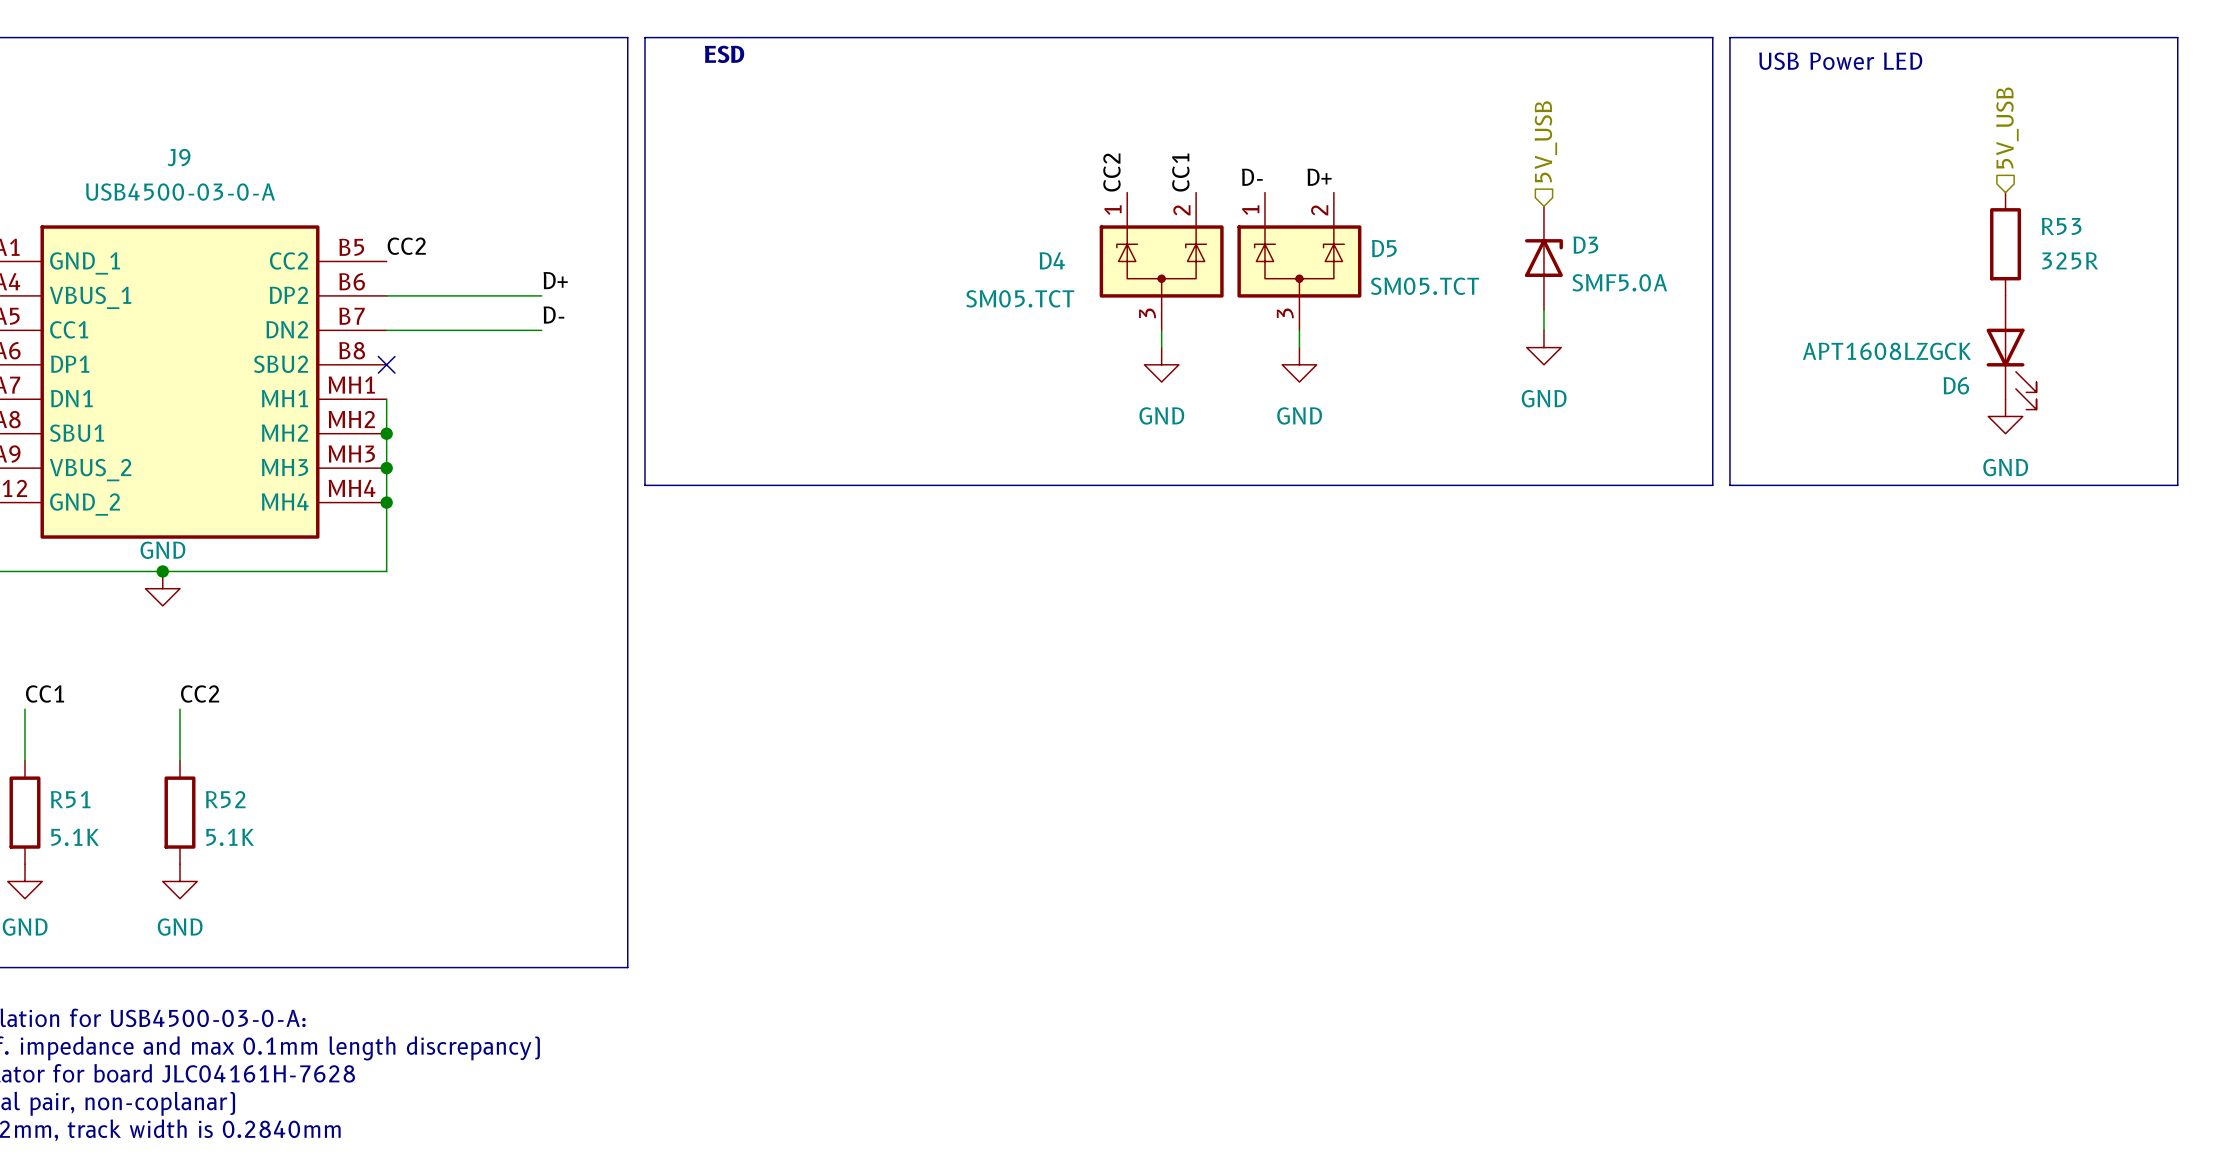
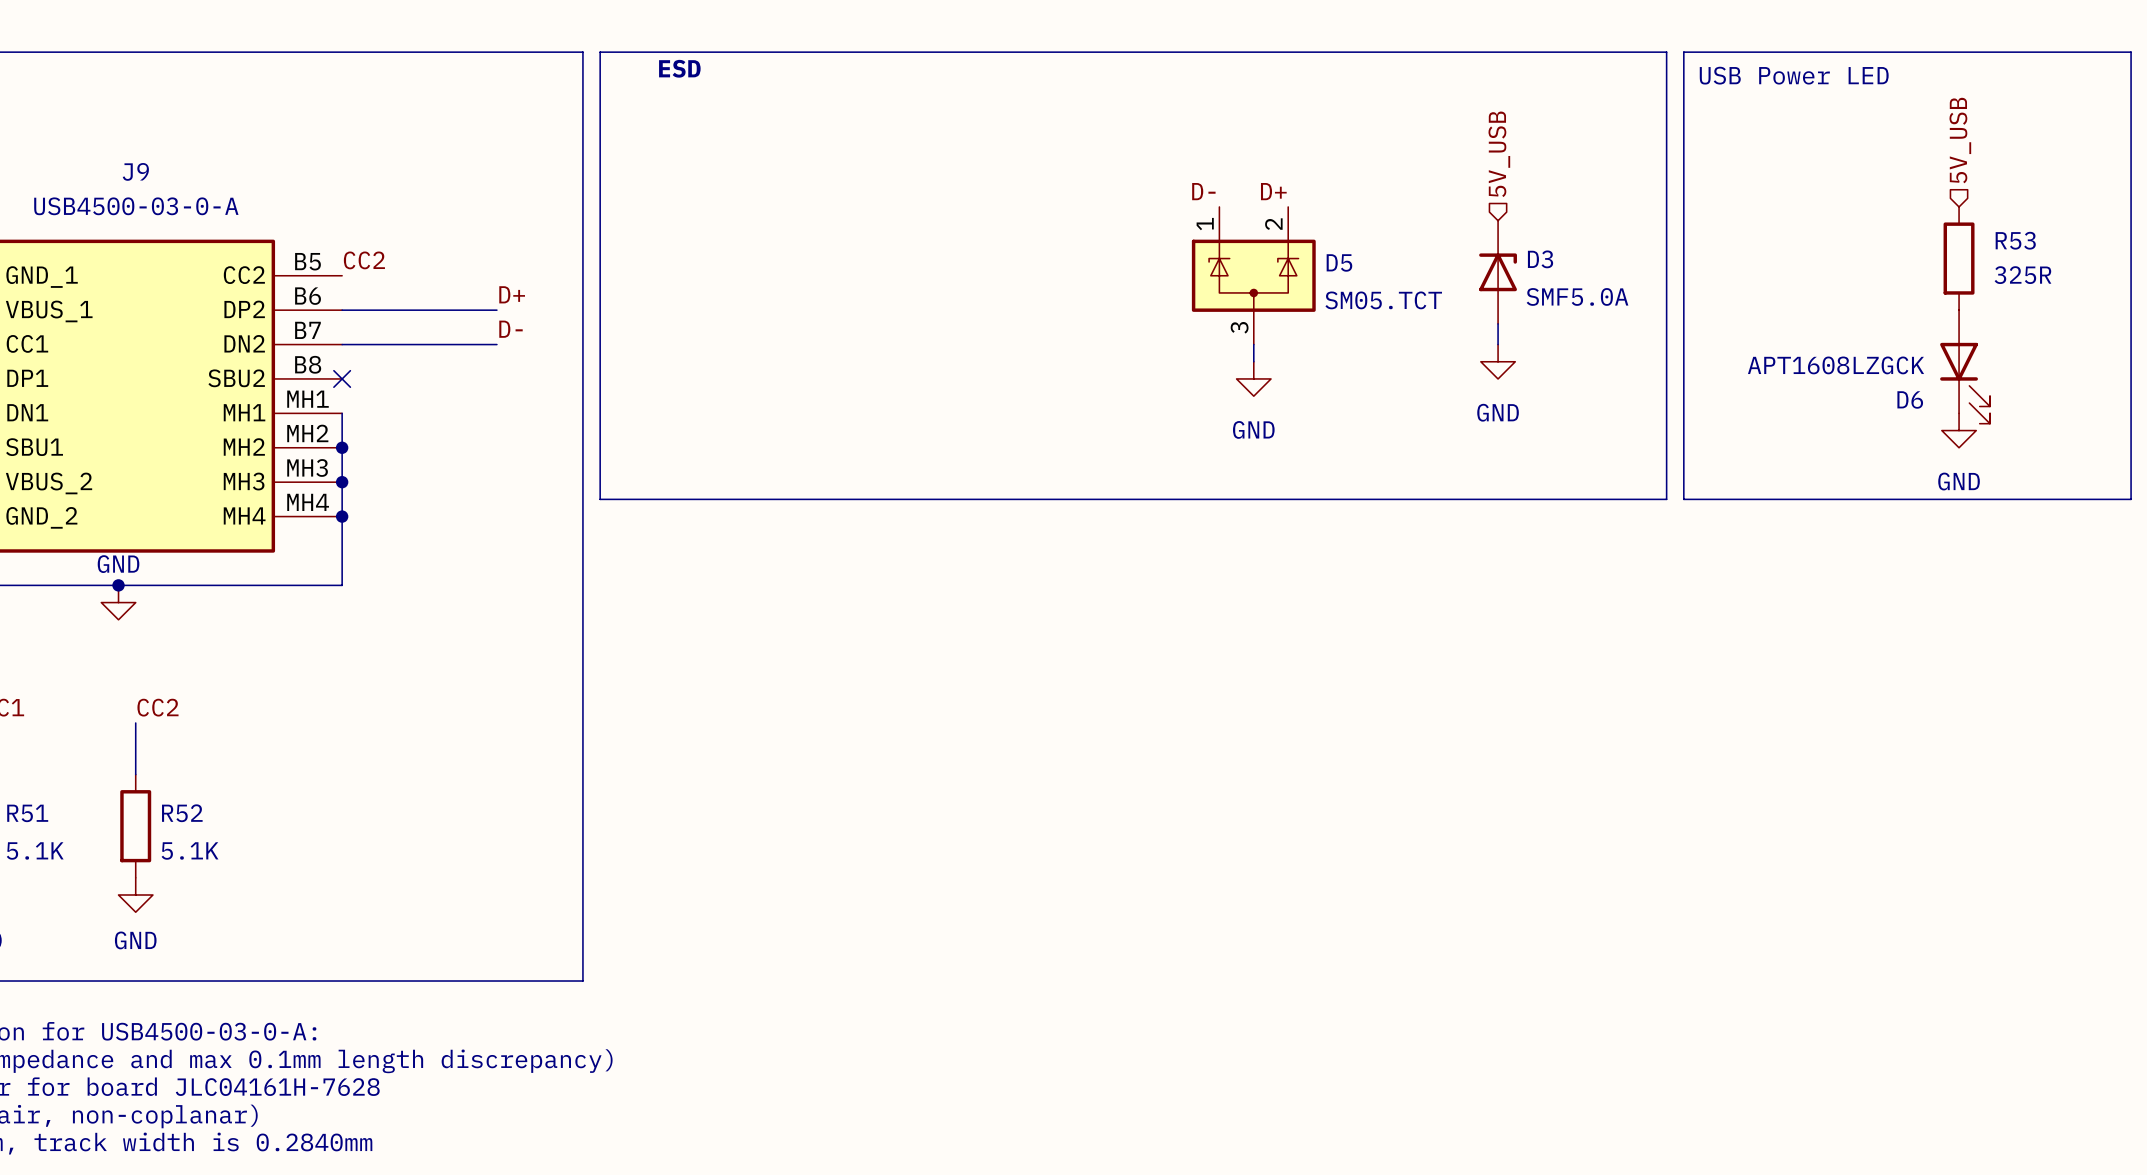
label: CC2 (1111, 172) -> none
label: CC1 (1180, 172) -> none
D4: SM05.TCT (1161, 261) -> none
wire: (1161, 330) (1161, 347) -> none
power symbol: GND (1161, 364) -> none

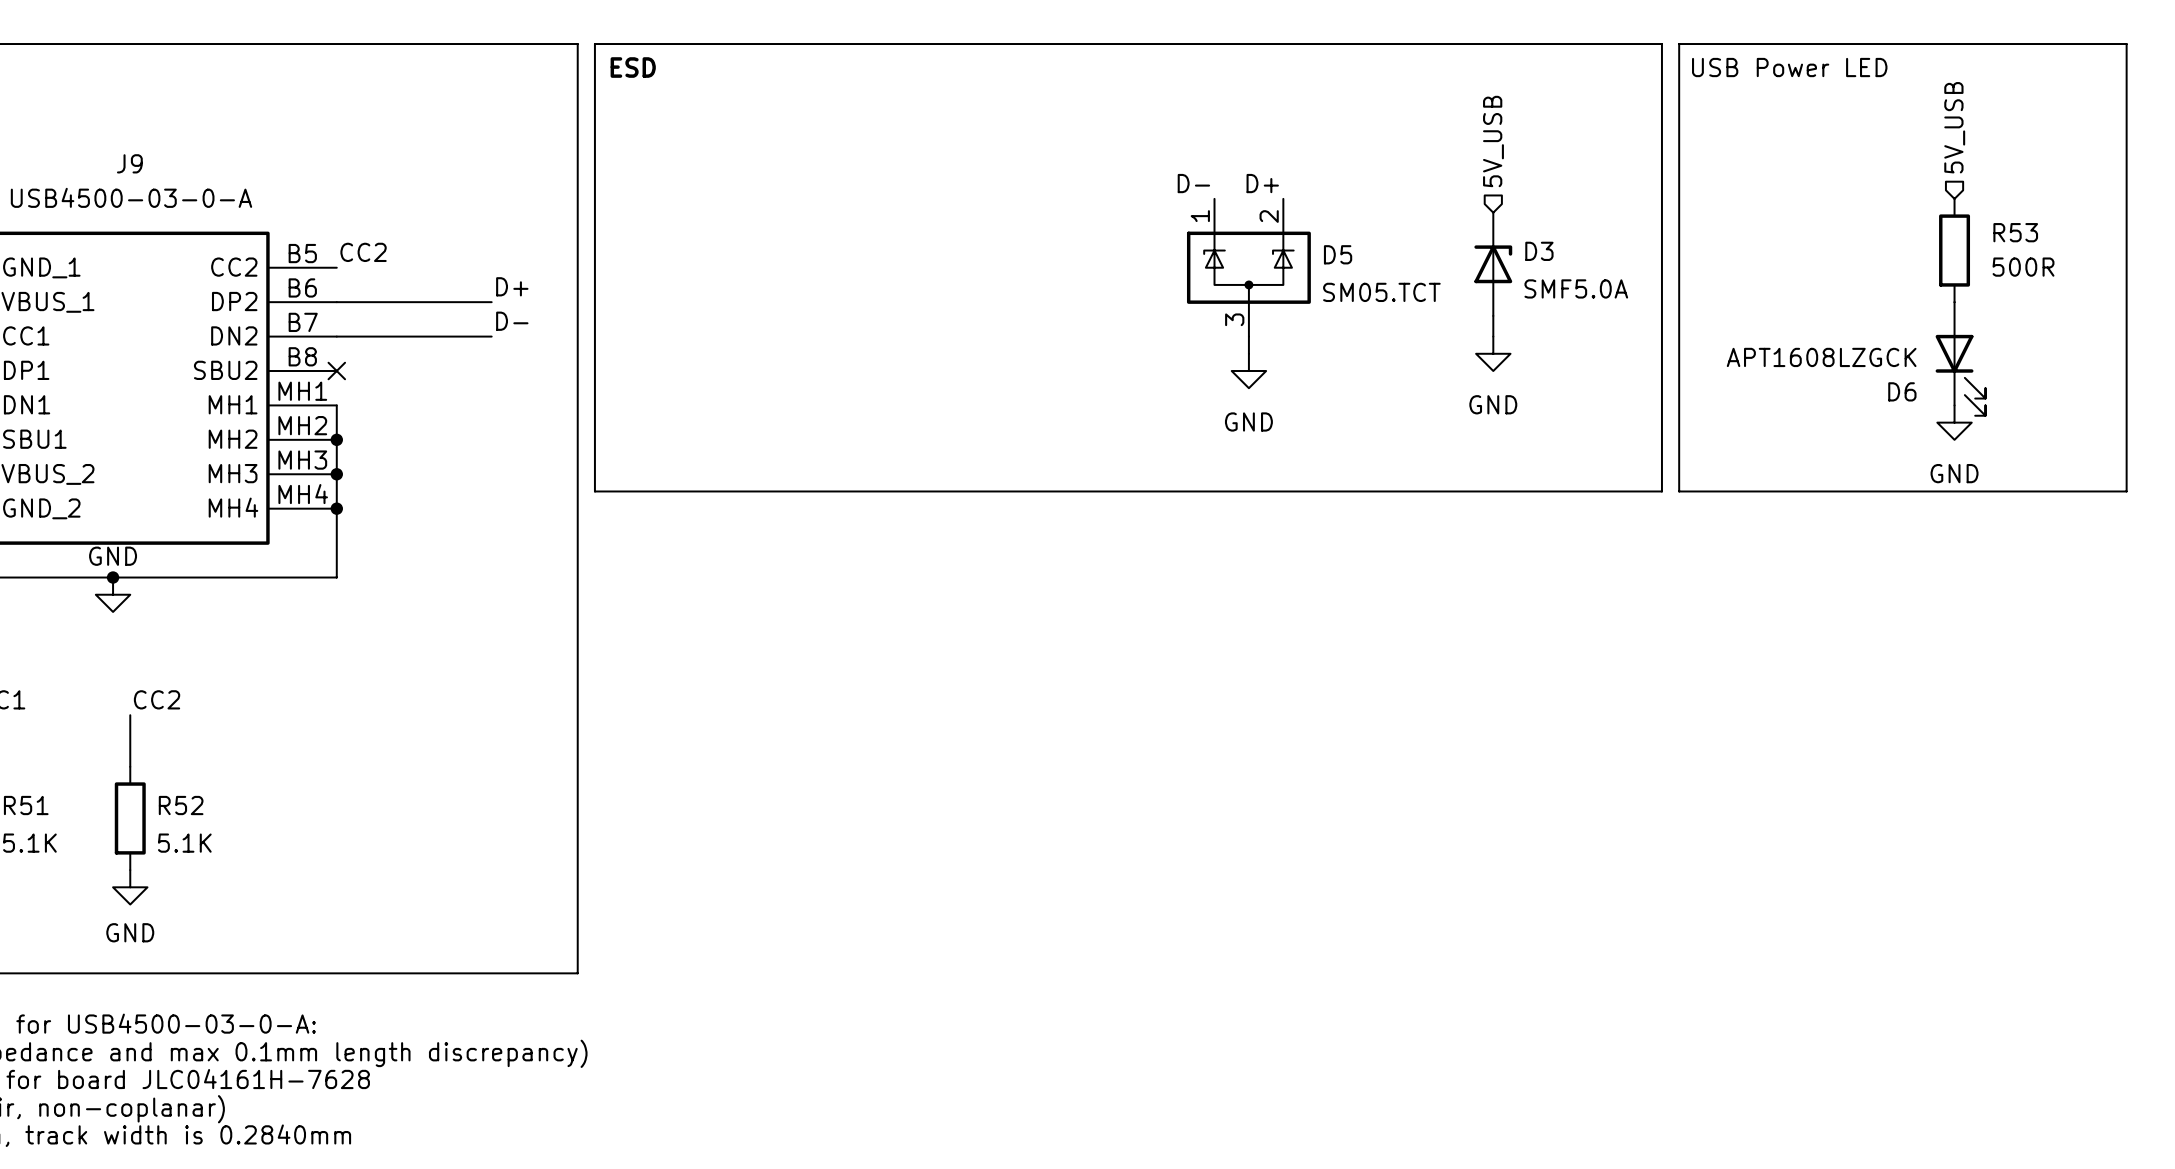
text position: ESD (679, 68) -> ESD (633, 67)
R53 value: 325R (2022, 275) -> 500R (2023, 267)

